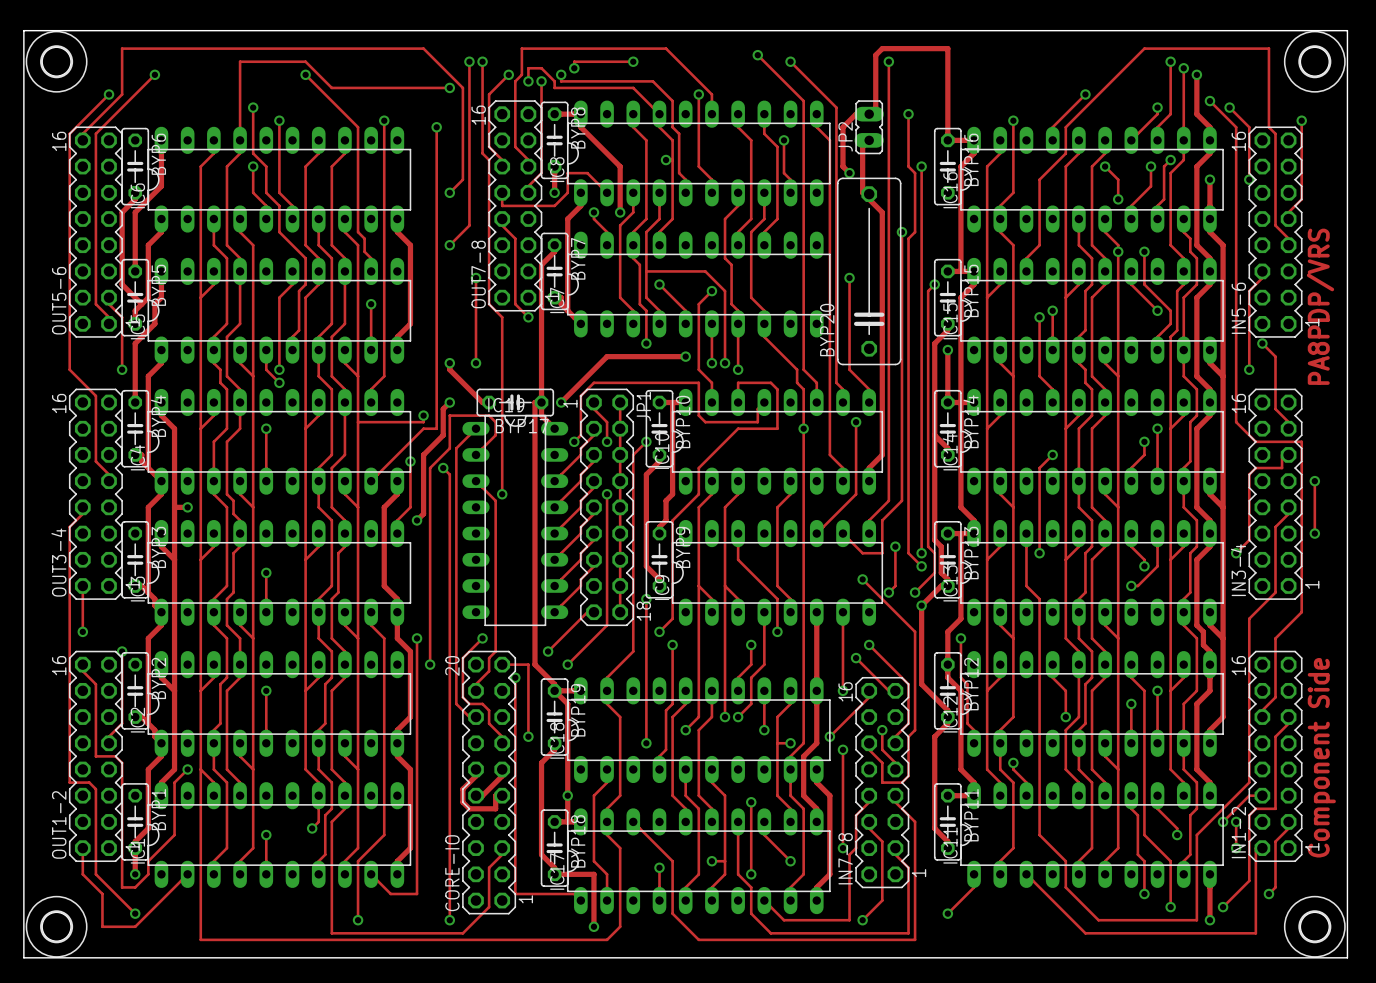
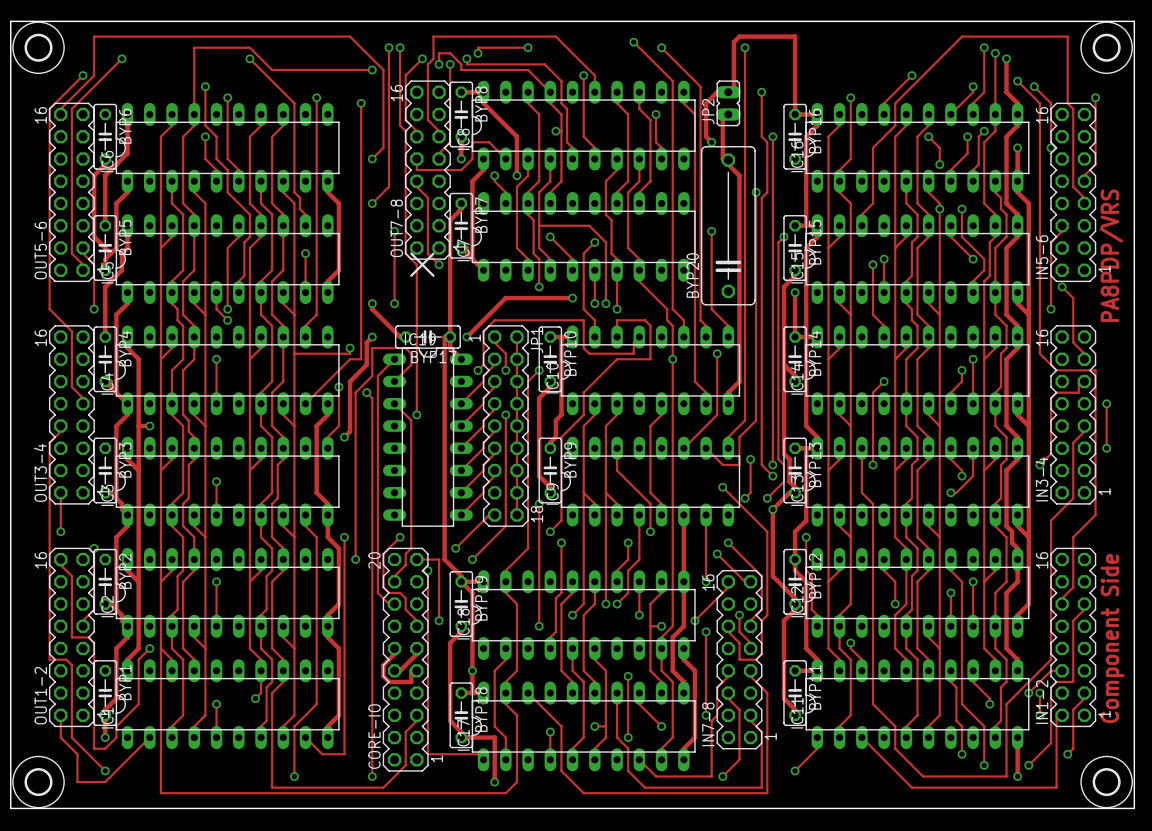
line: none -> (411, 253) (433, 275)
line: none -> (433, 253) (411, 275)

